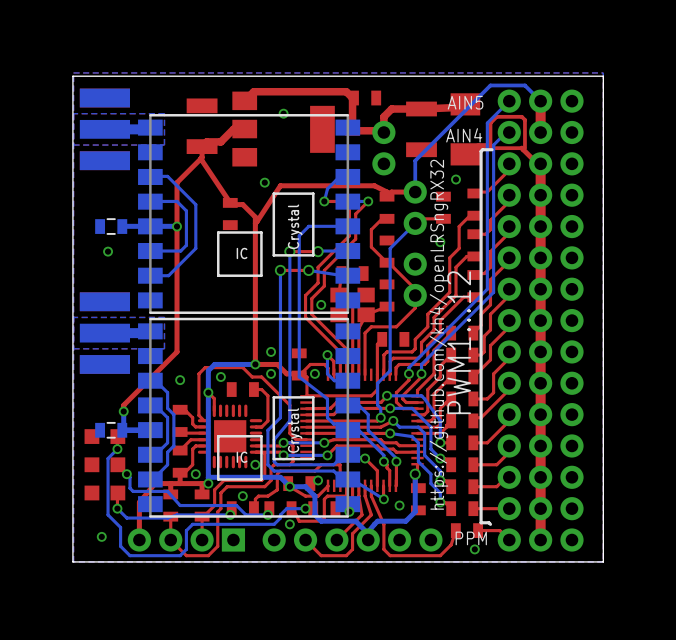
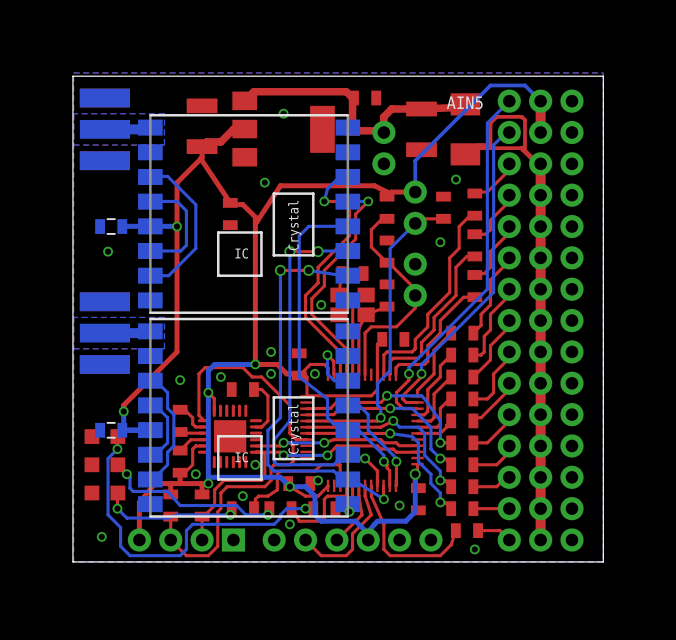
text: AIN4 (464, 135) -> none
line: (492, 149) (481, 151) (481, 522) (490, 524) -> none
text: https://github.com/kh4/openLRSngRX32 (438, 334) -> none
text: PWM1...12 (459, 342) -> none
text: PPM (471, 538) -> none

